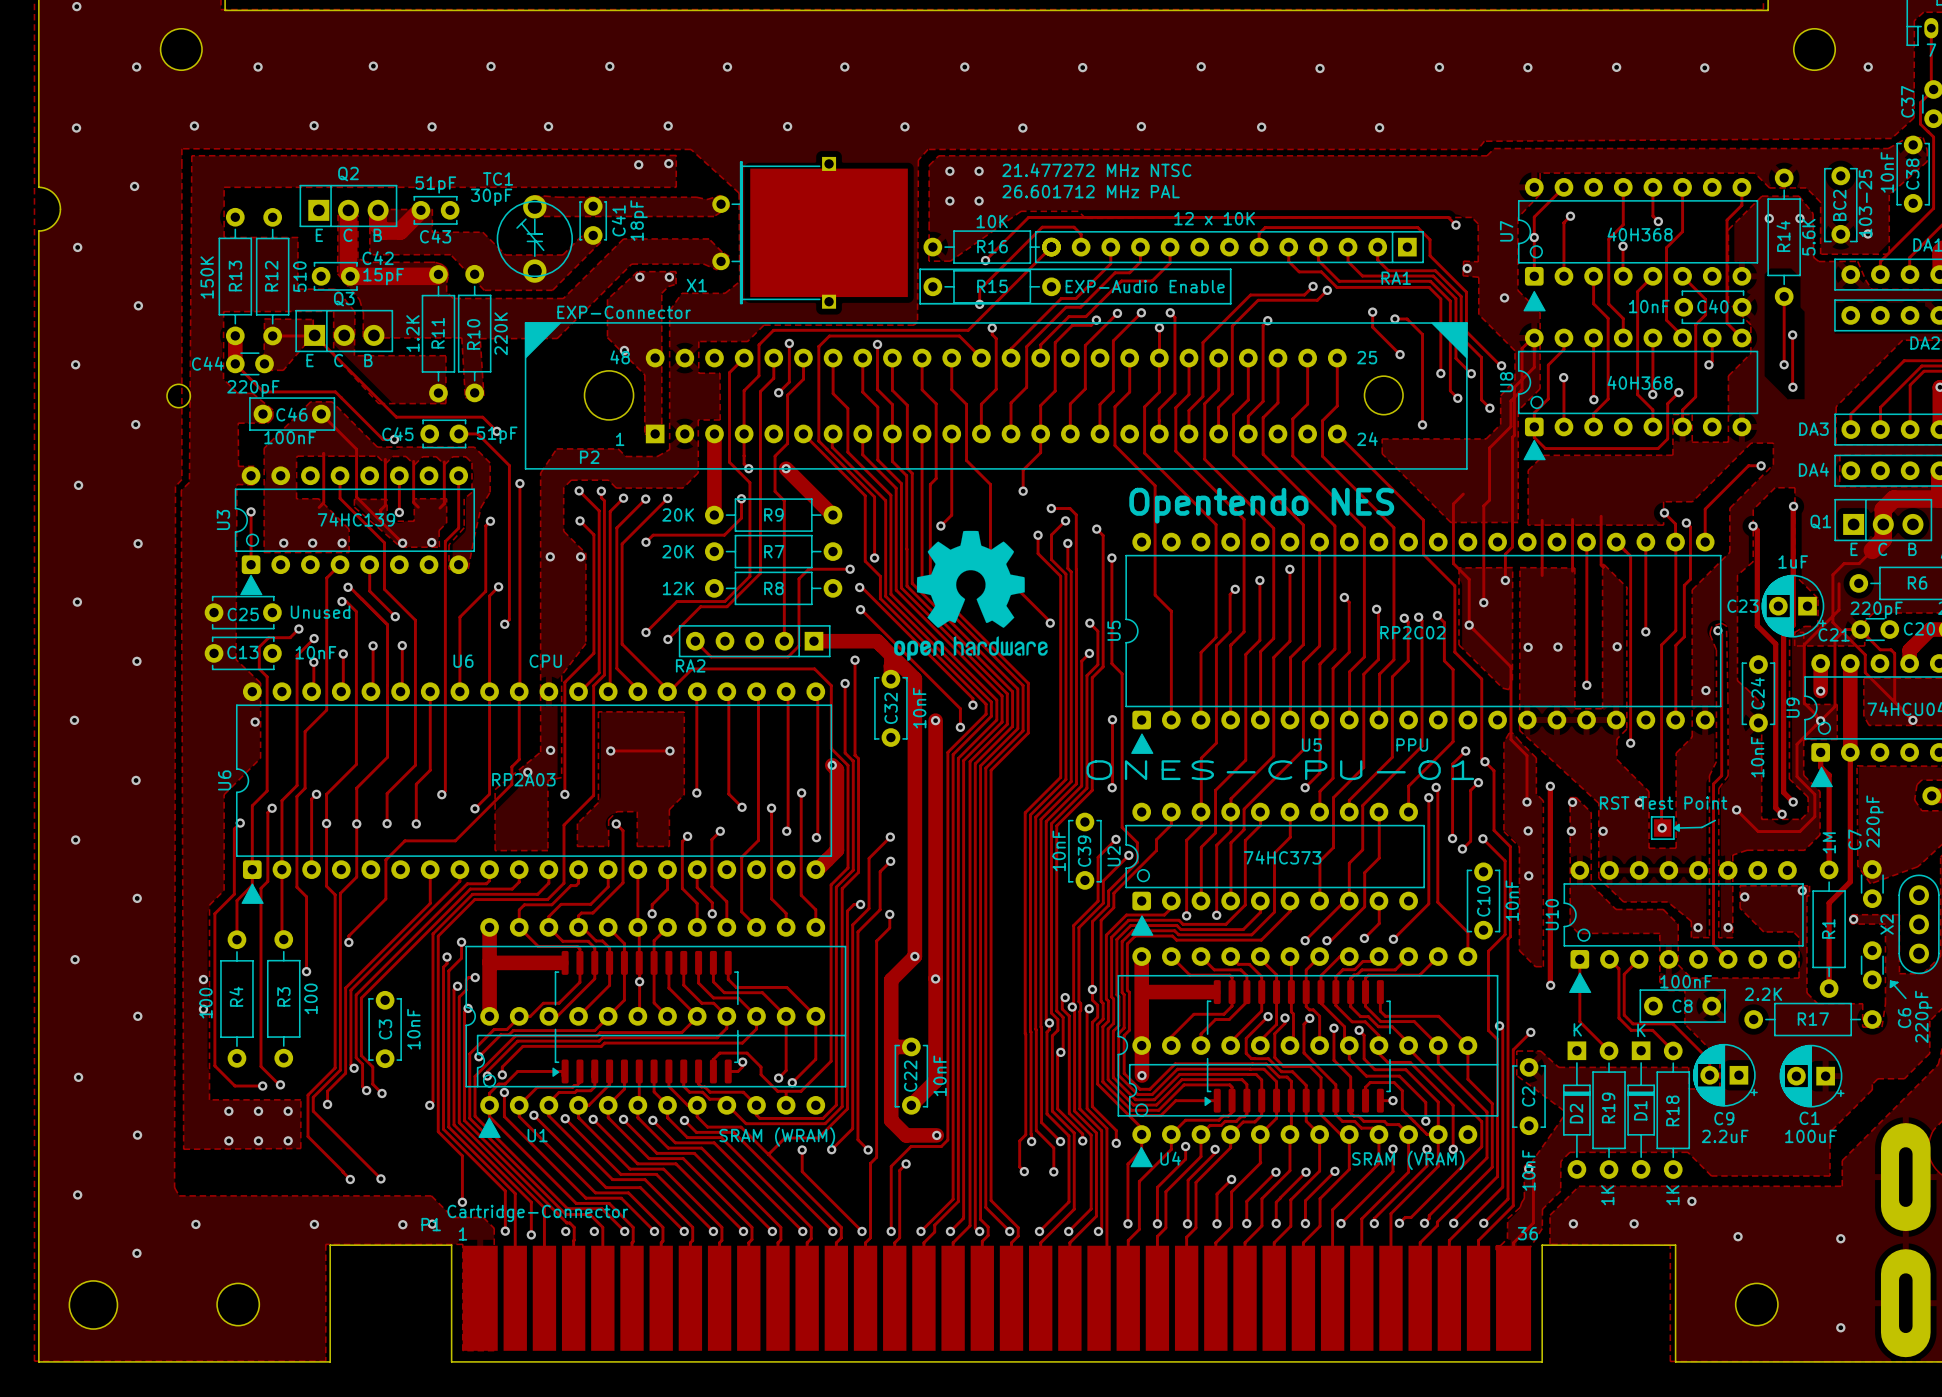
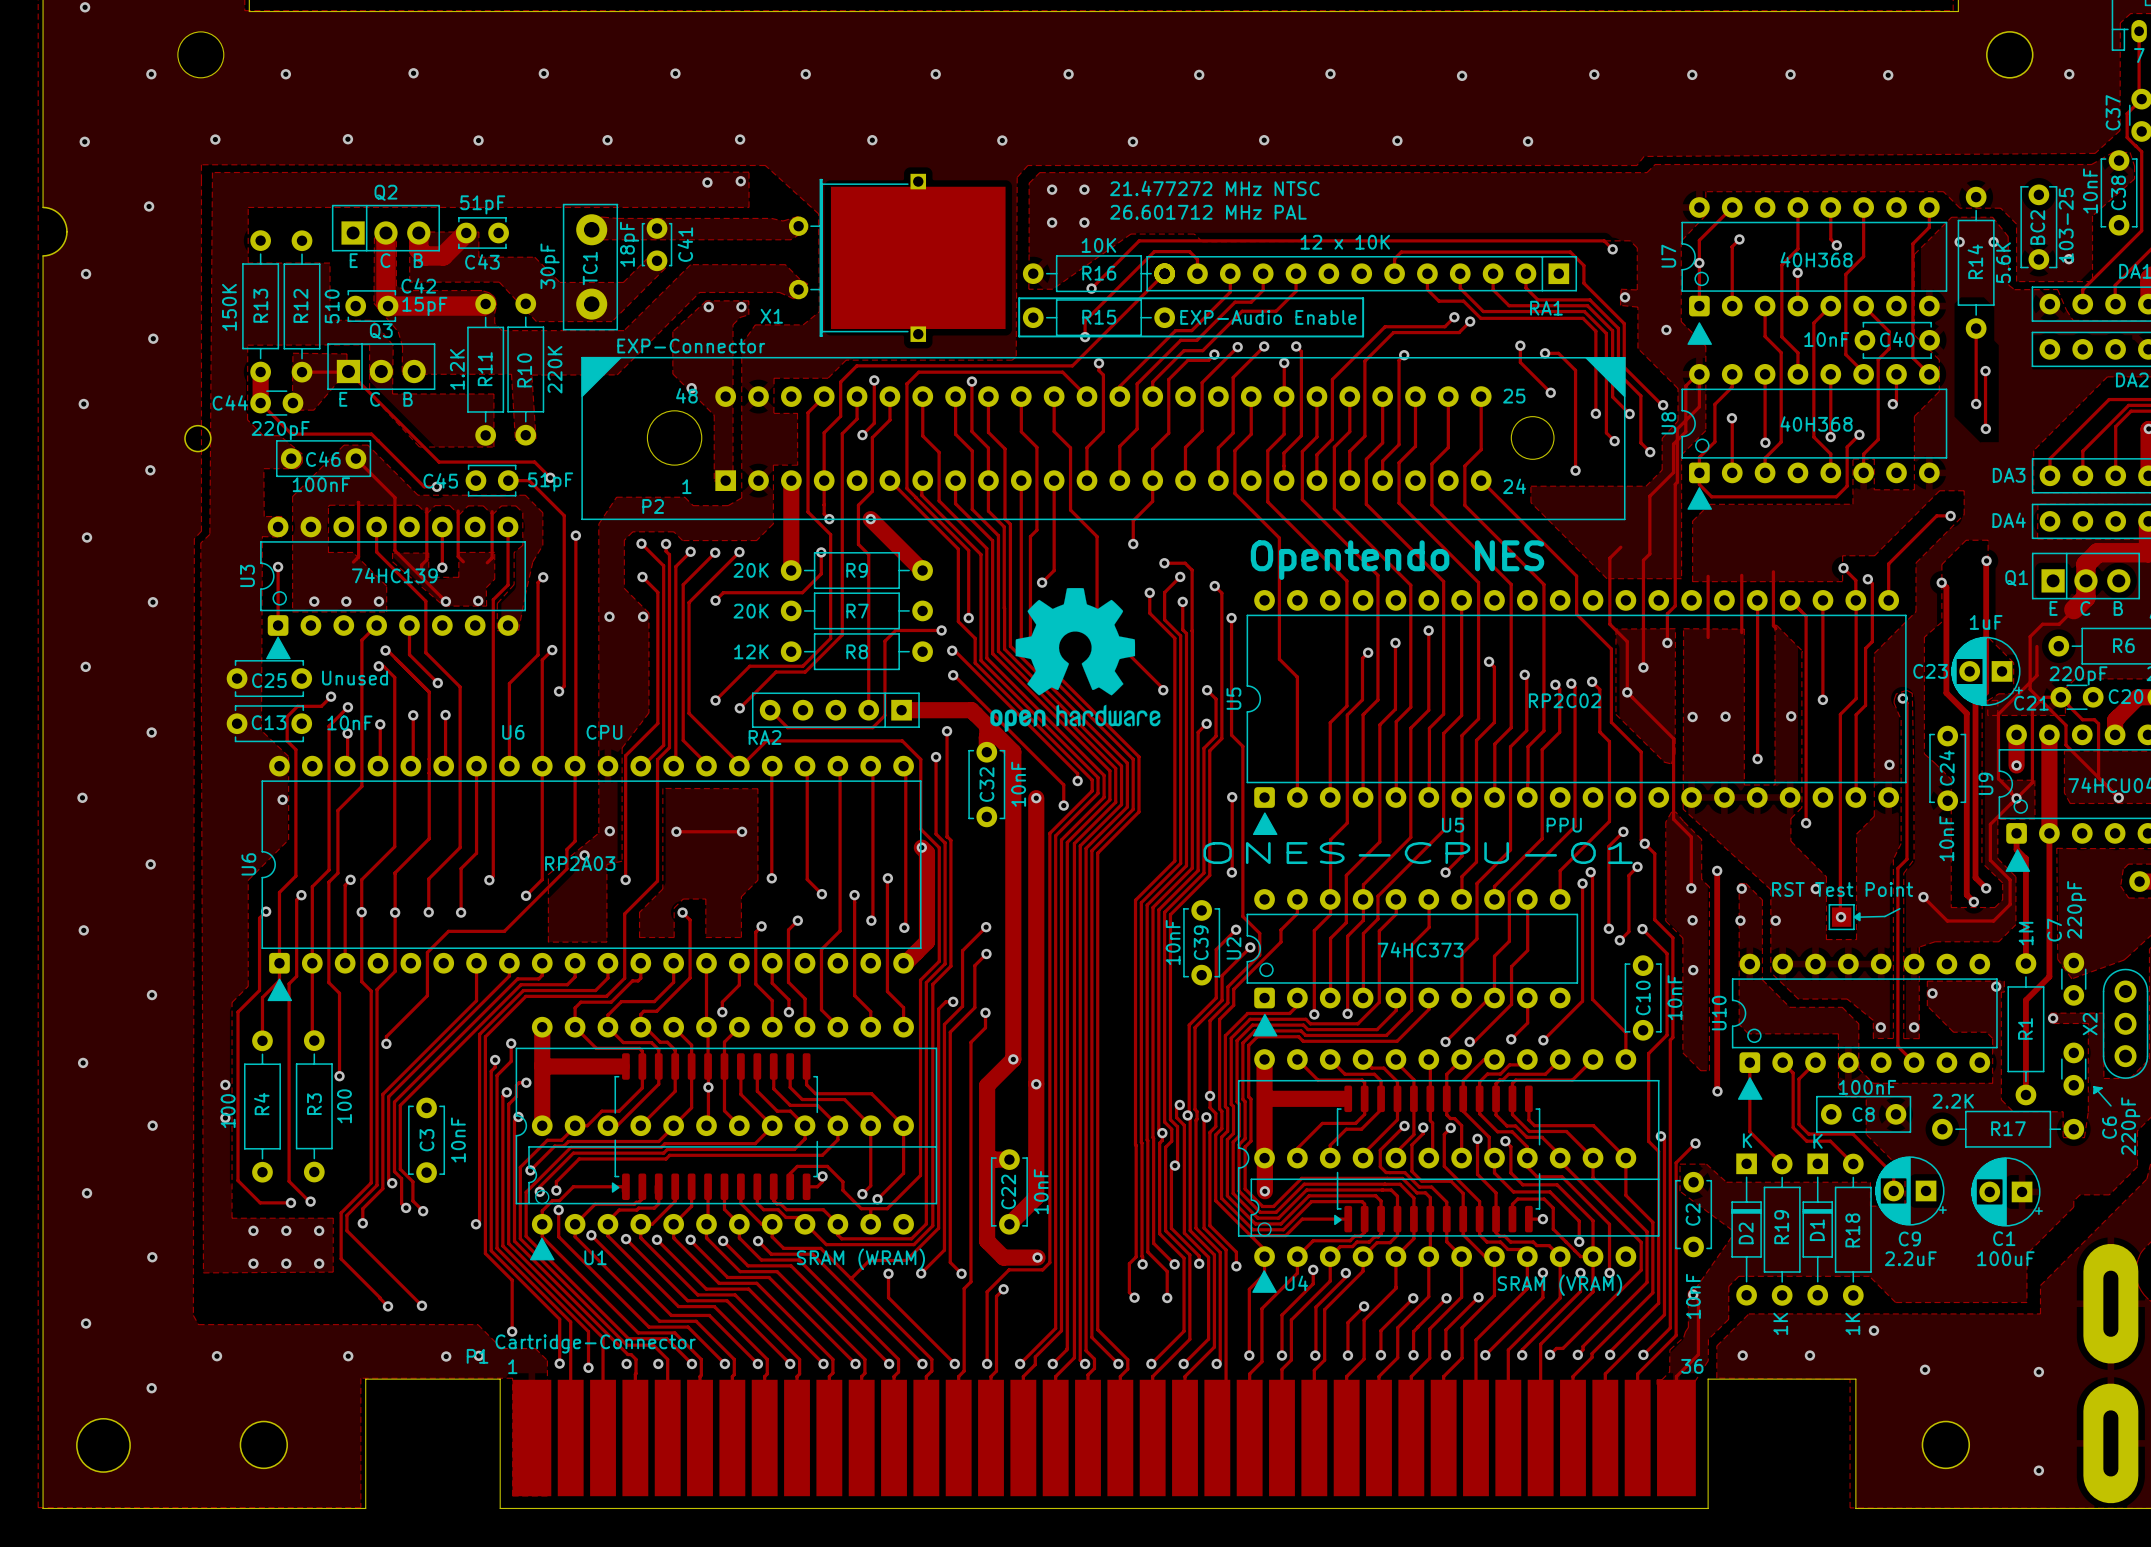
TC1 name position: TC1 (498, 178) -> TC1 (590, 268)
line: none -> (617, 204) (617, 329) (563, 329) (563, 204) (617, 204)
TC1 footprint: [496, 195, 573, 283] -> [576, 214, 608, 320]
TC1 value position: 30pF (491, 197) -> 30pF (550, 266)
C41 value position: 18pF (639, 220) -> 18pF (629, 244)

